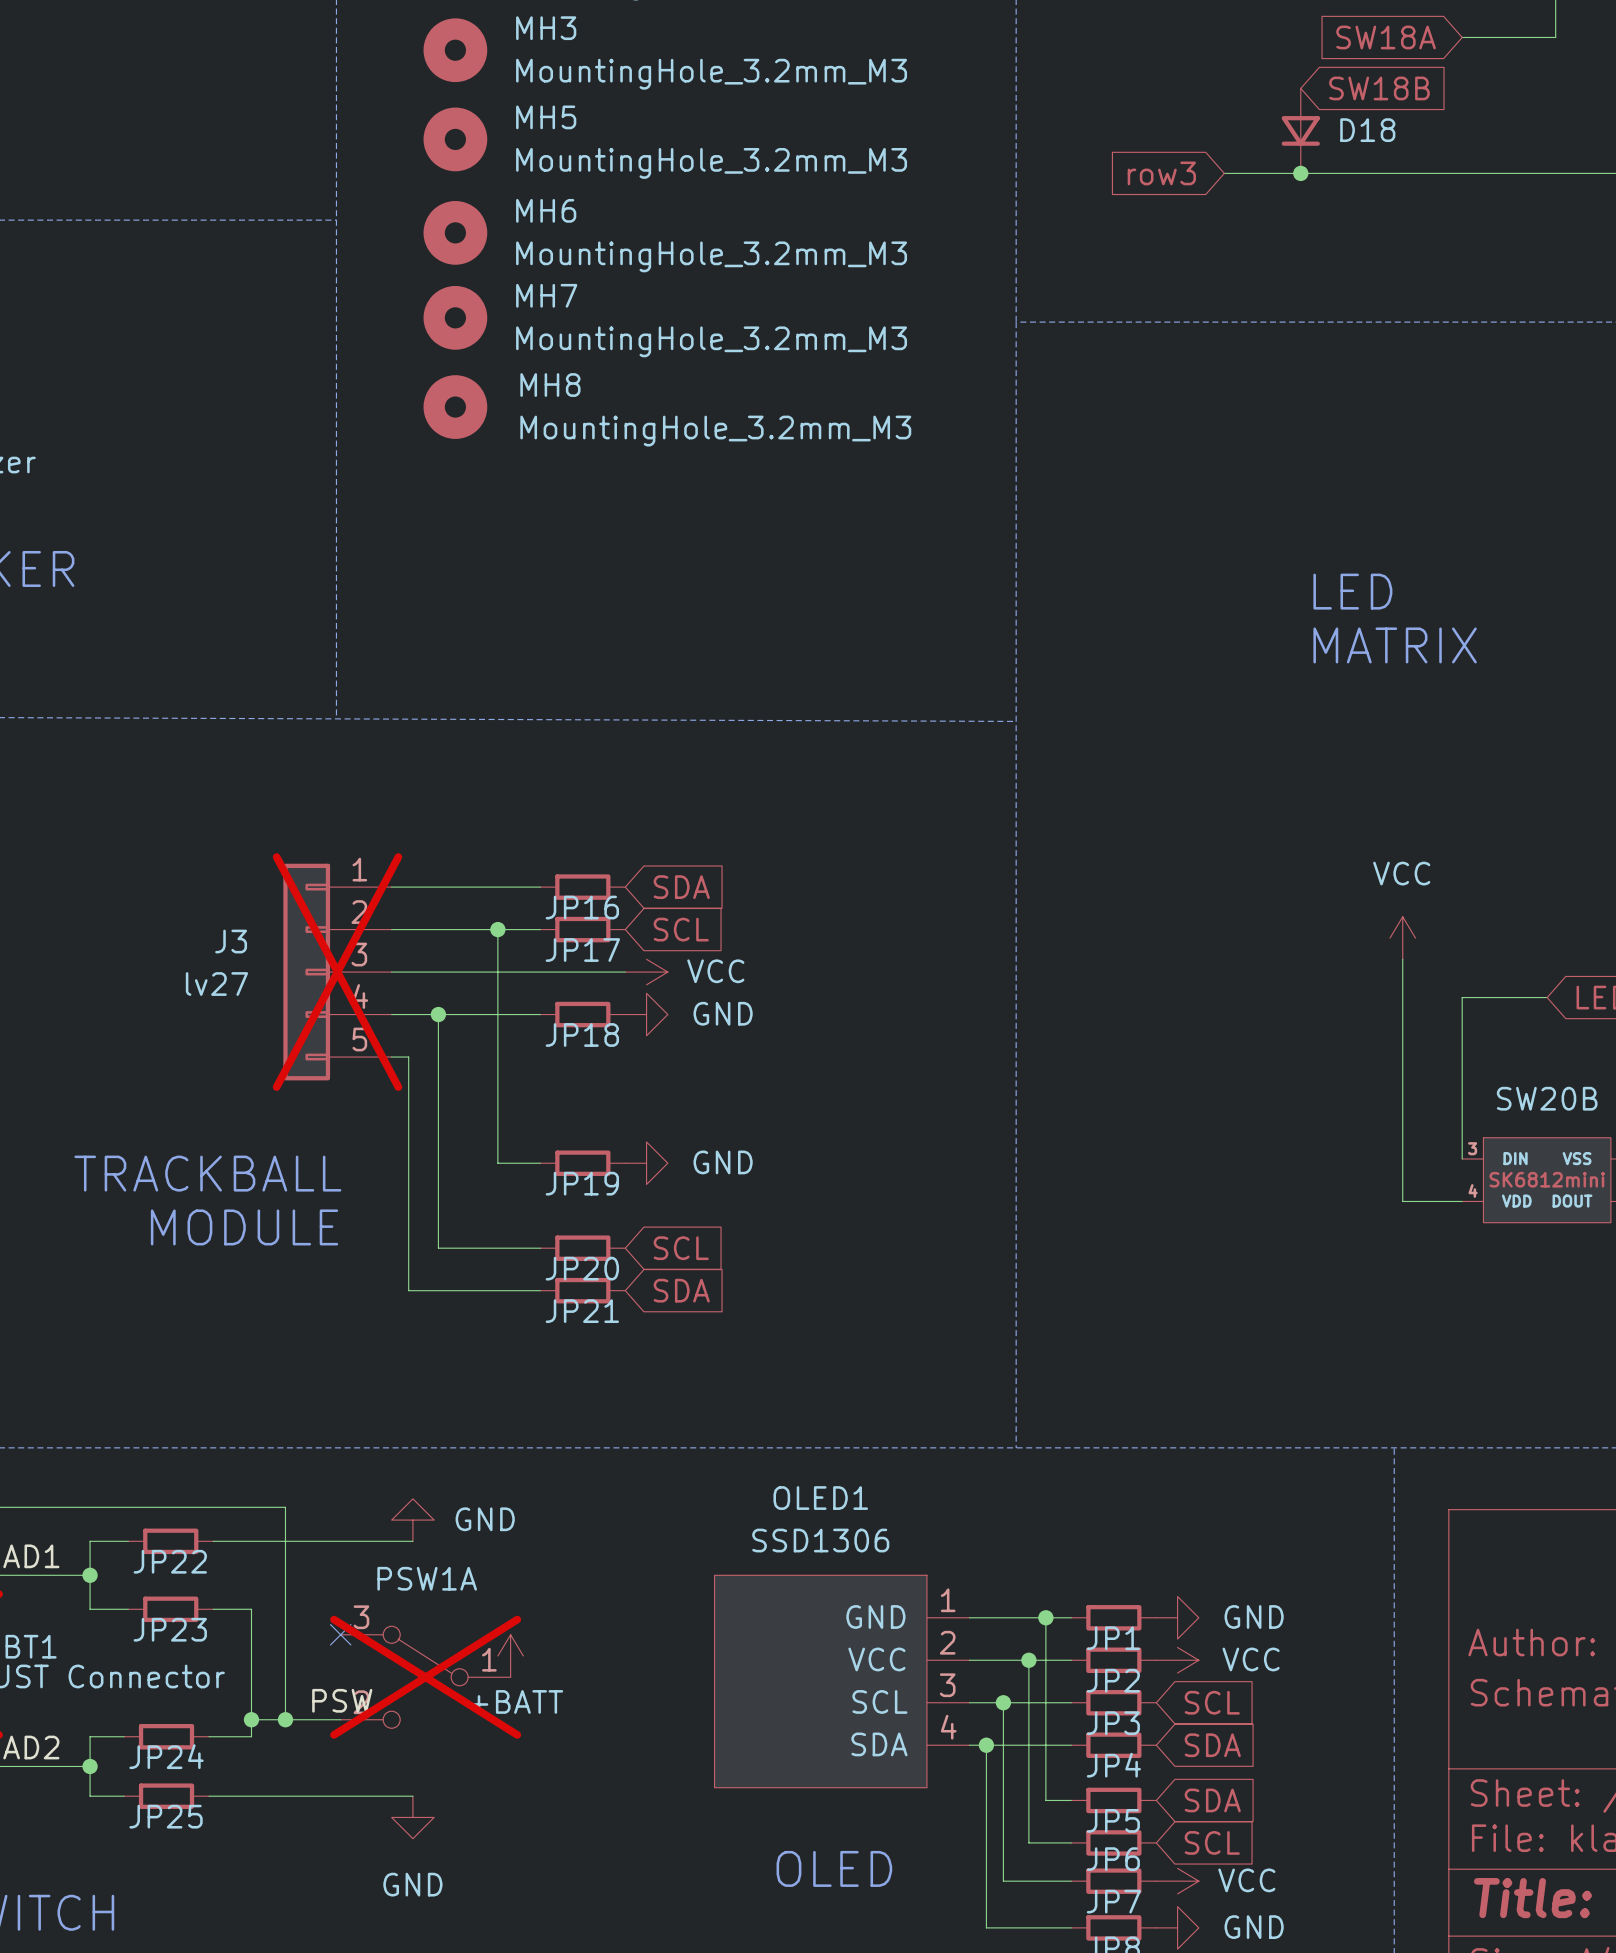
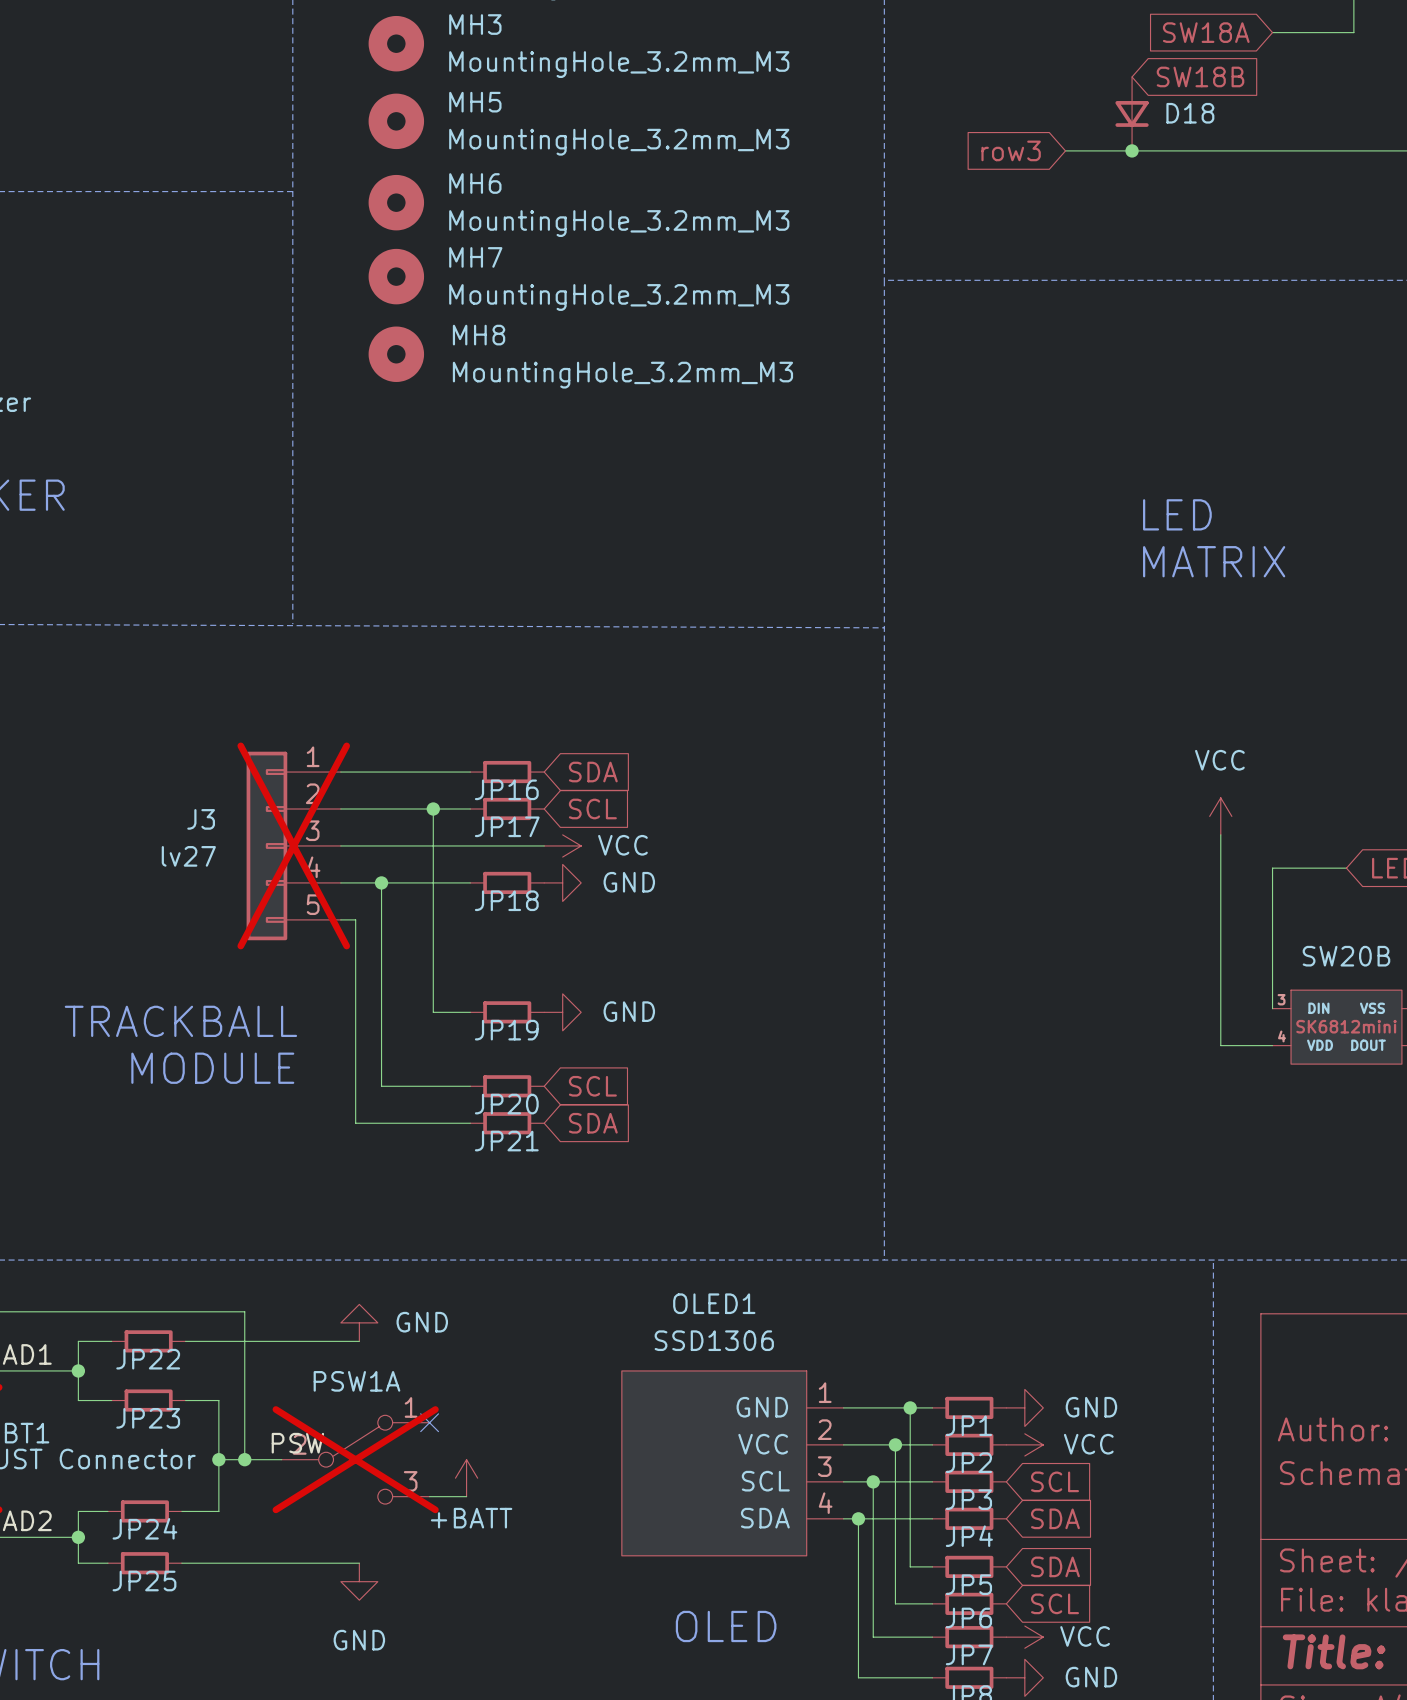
wire: (281, 1507) (285, 1507) (285, 1719) -> (244, 1311) (244, 1459)
PSW1A symbol: [340, 1626, 511, 1729] -> [281, 1415, 430, 1505]
no-connect mark: (340, 1634) -> none
no-connect mark: none -> (429, 1422)
power symbol position: +BATT (510, 1656) -> +BATT (466, 1478)
wire: none -> (218, 1459) (281, 1459)
junction: none -> (218, 1459)
junction: none -> (244, 1459)
label position: PSW (342, 1700) -> PSW (297, 1443)
wire: (251, 1719) (340, 1719) -> none
junction: (251, 1719) -> none
junction: (285, 1719) -> none
wire: none -> (429, 1496) (466, 1496)

